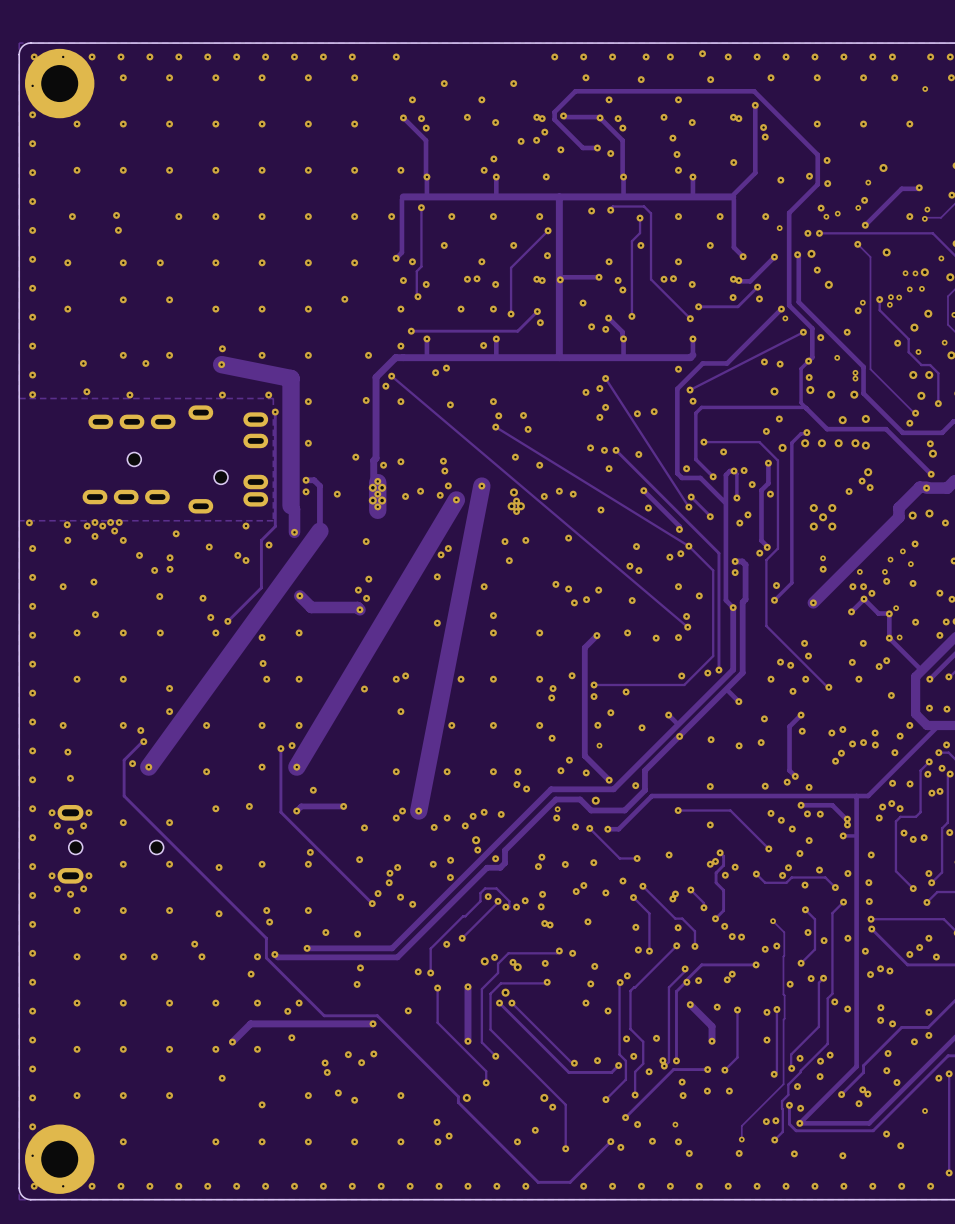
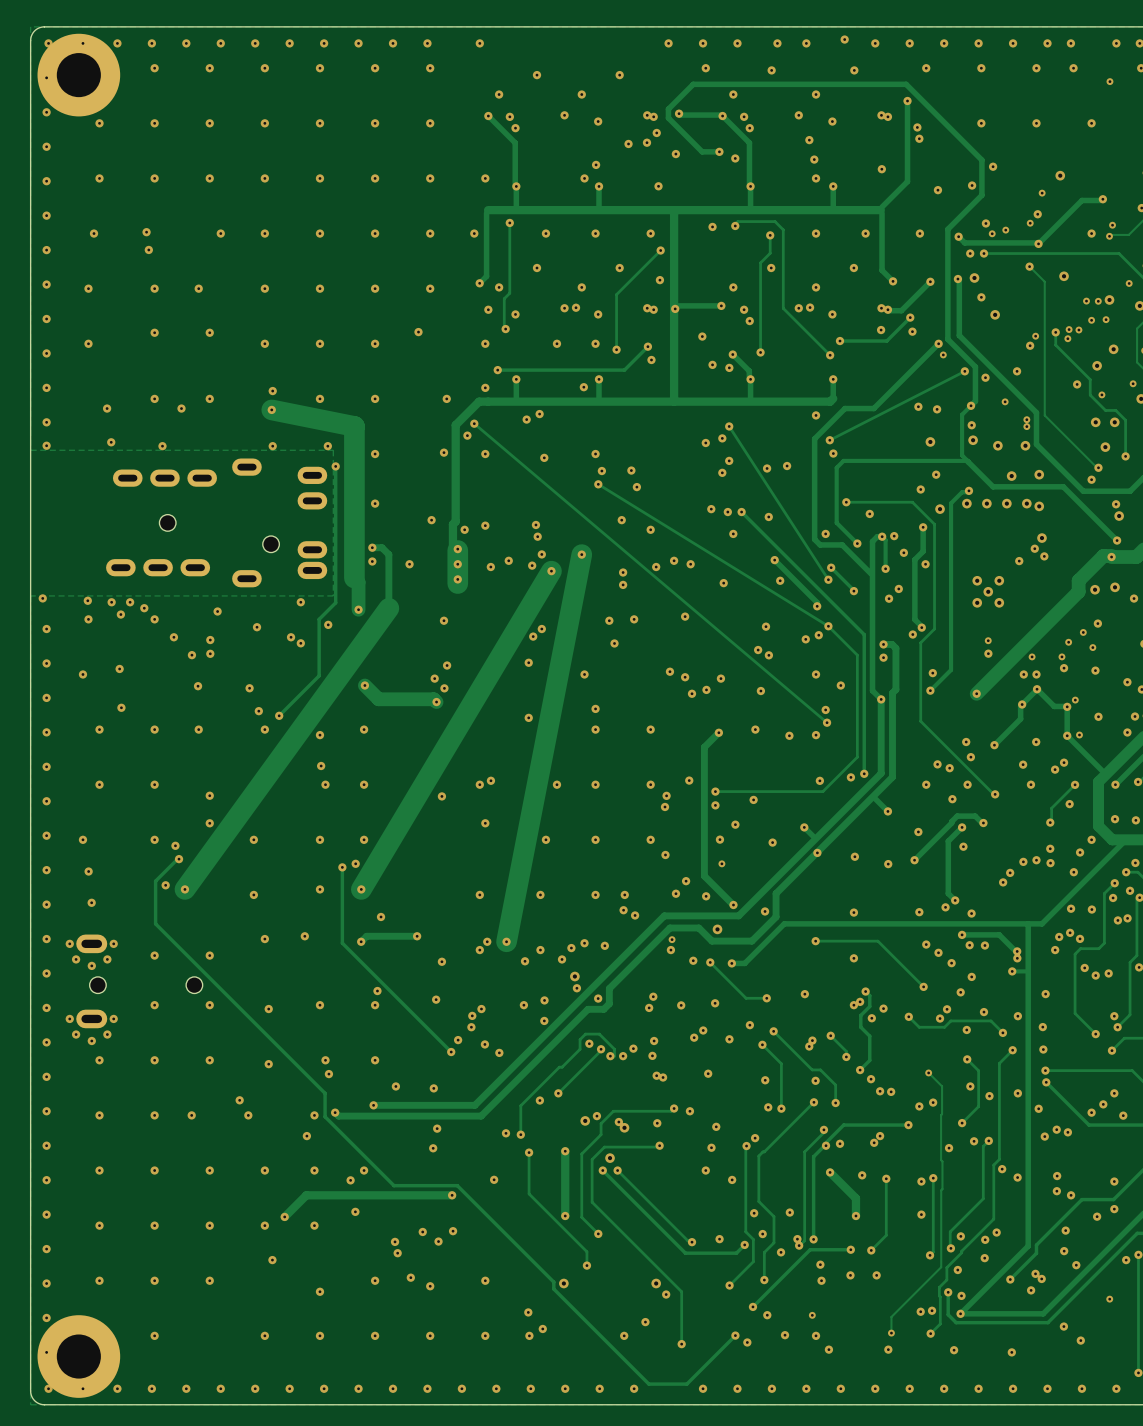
via position: (827, 183) -> (958, 236)
track: none -> (958, 236) (964, 242) (1037, 242)
via: (779, 228) -> none
via: (372, 487) -> none
via: (382, 487) -> none
via: (513, 492) -> none
via: (372, 500) -> none
via: (382, 500) -> none
via: (511, 506) -> none
via: (520, 506) -> none
via: (94, 522) -> none
via: (110, 522) -> none
via: (119, 522) -> none
via: (871, 593) -> none
track: none -> (1020, 705) (1020, 718) (994, 745)
via: none -> (994, 745)
track: none -> (1075, 784) (1051, 808) (1051, 822)
via: none -> (1075, 784)
track: none -> (983, 823) (975, 816) (957, 816) (914, 860)
via: none -> (983, 823)
via: none -> (1050, 822)
via: (842, 729) -> none
via: (831, 732) -> none

